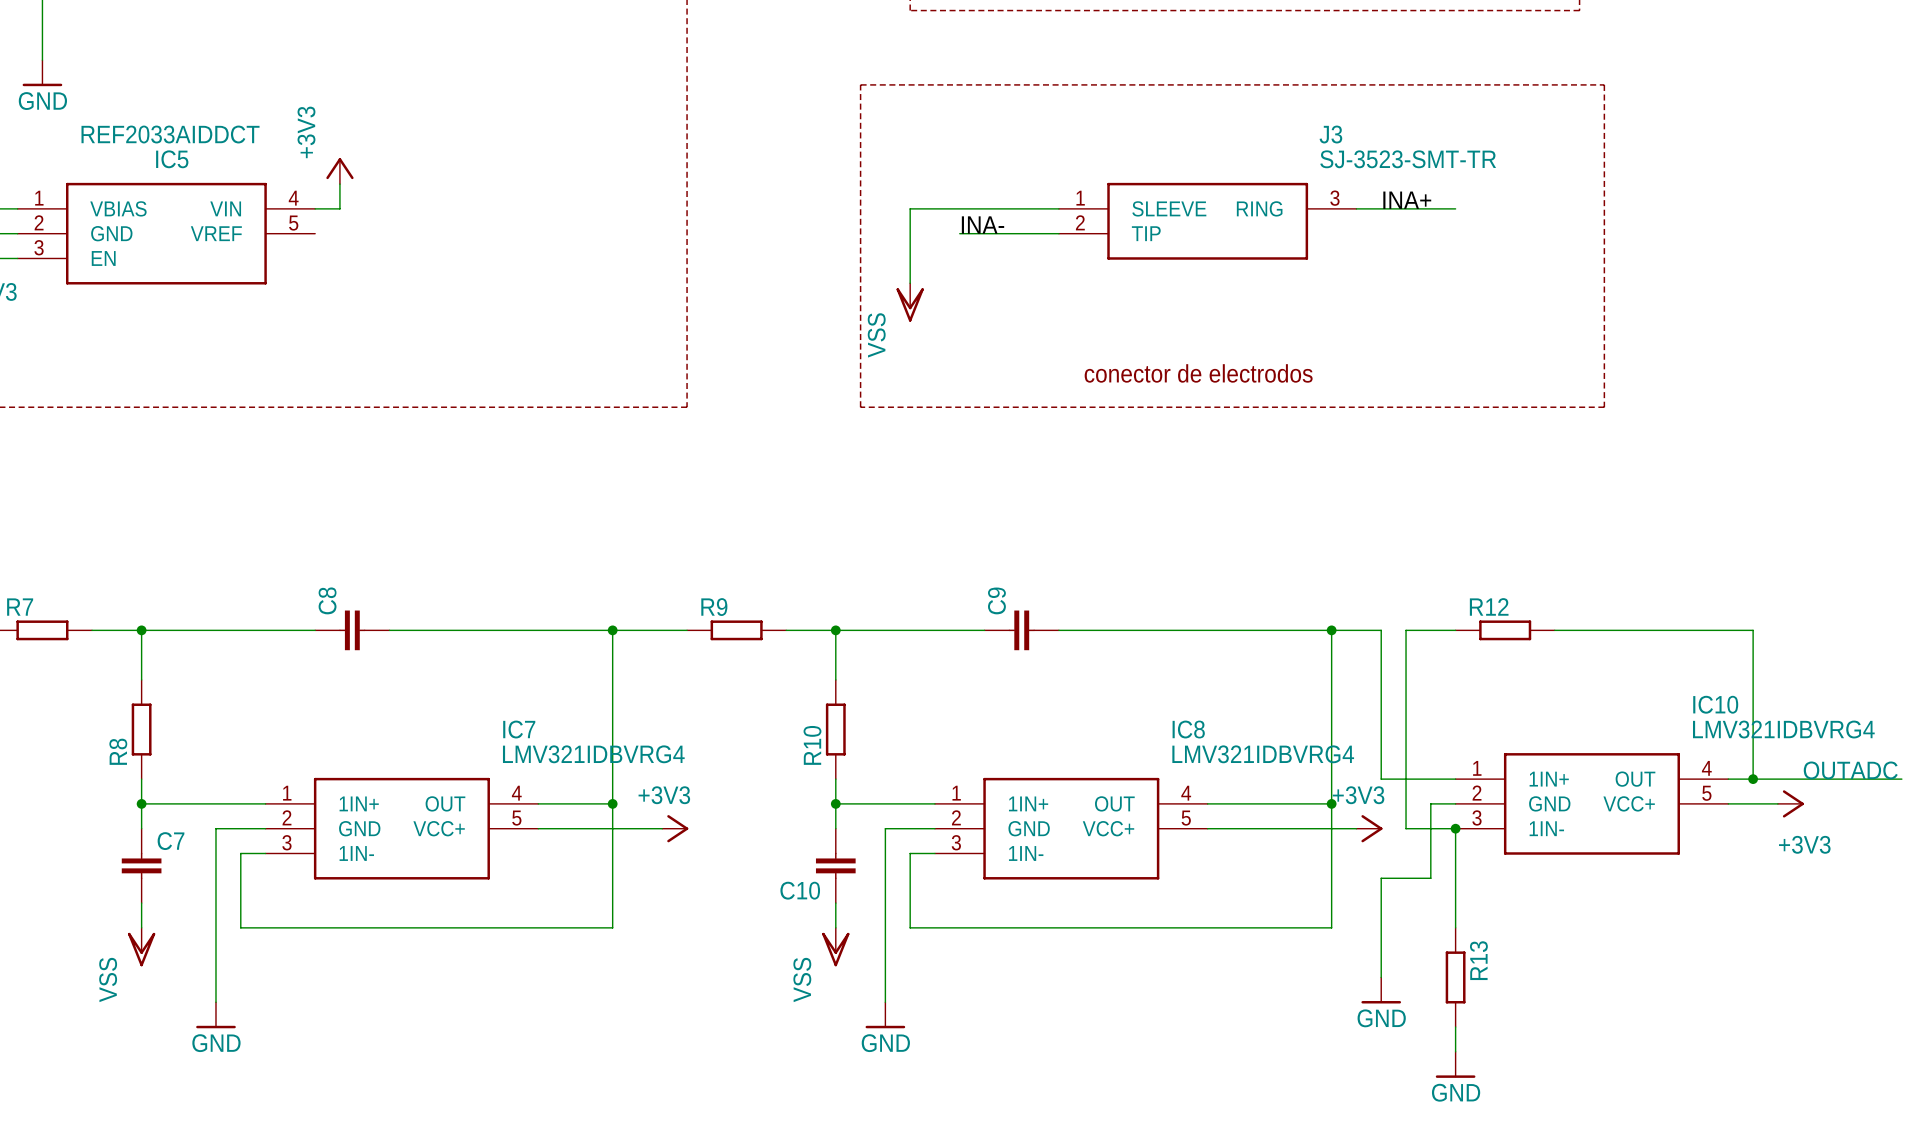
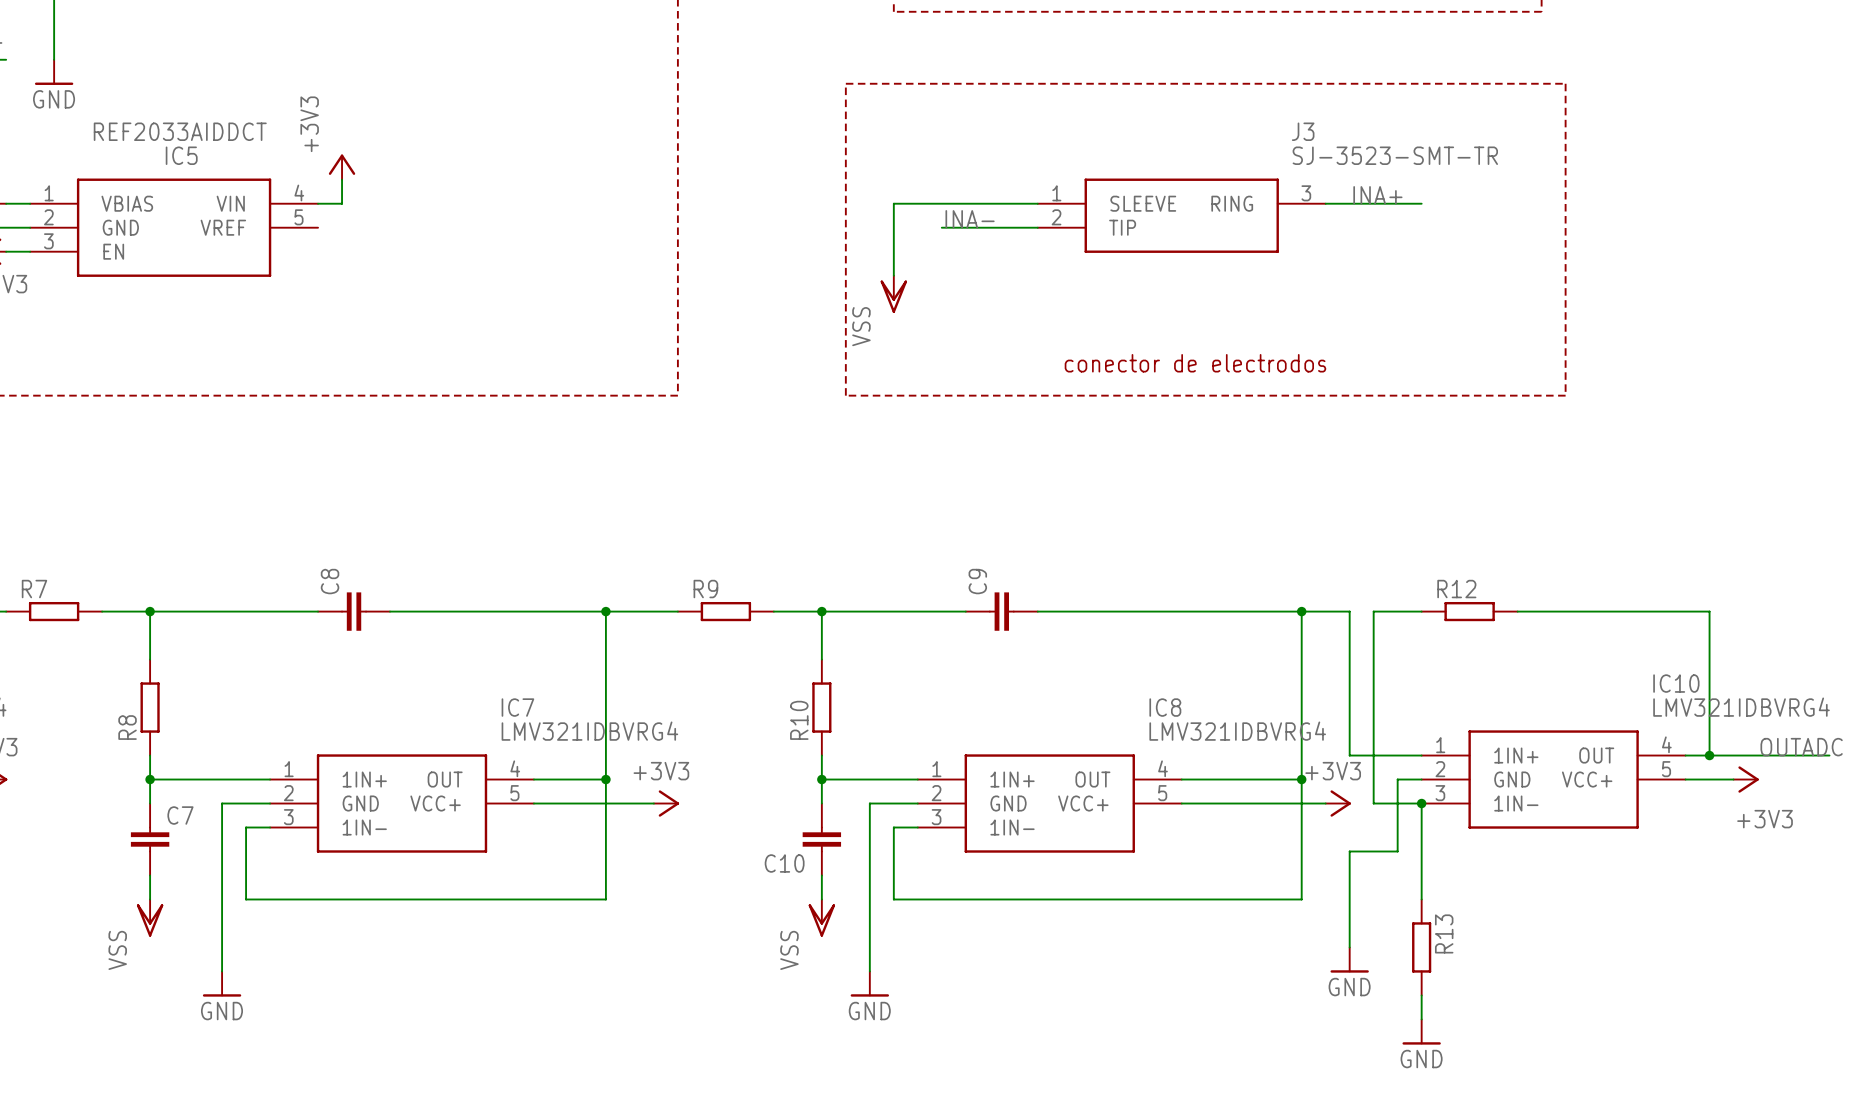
text: OUTADC (1850, 770) -> none
label: none -> OUTADC (1801, 747)
wire: (1877, 779) (1901, 779) -> none

